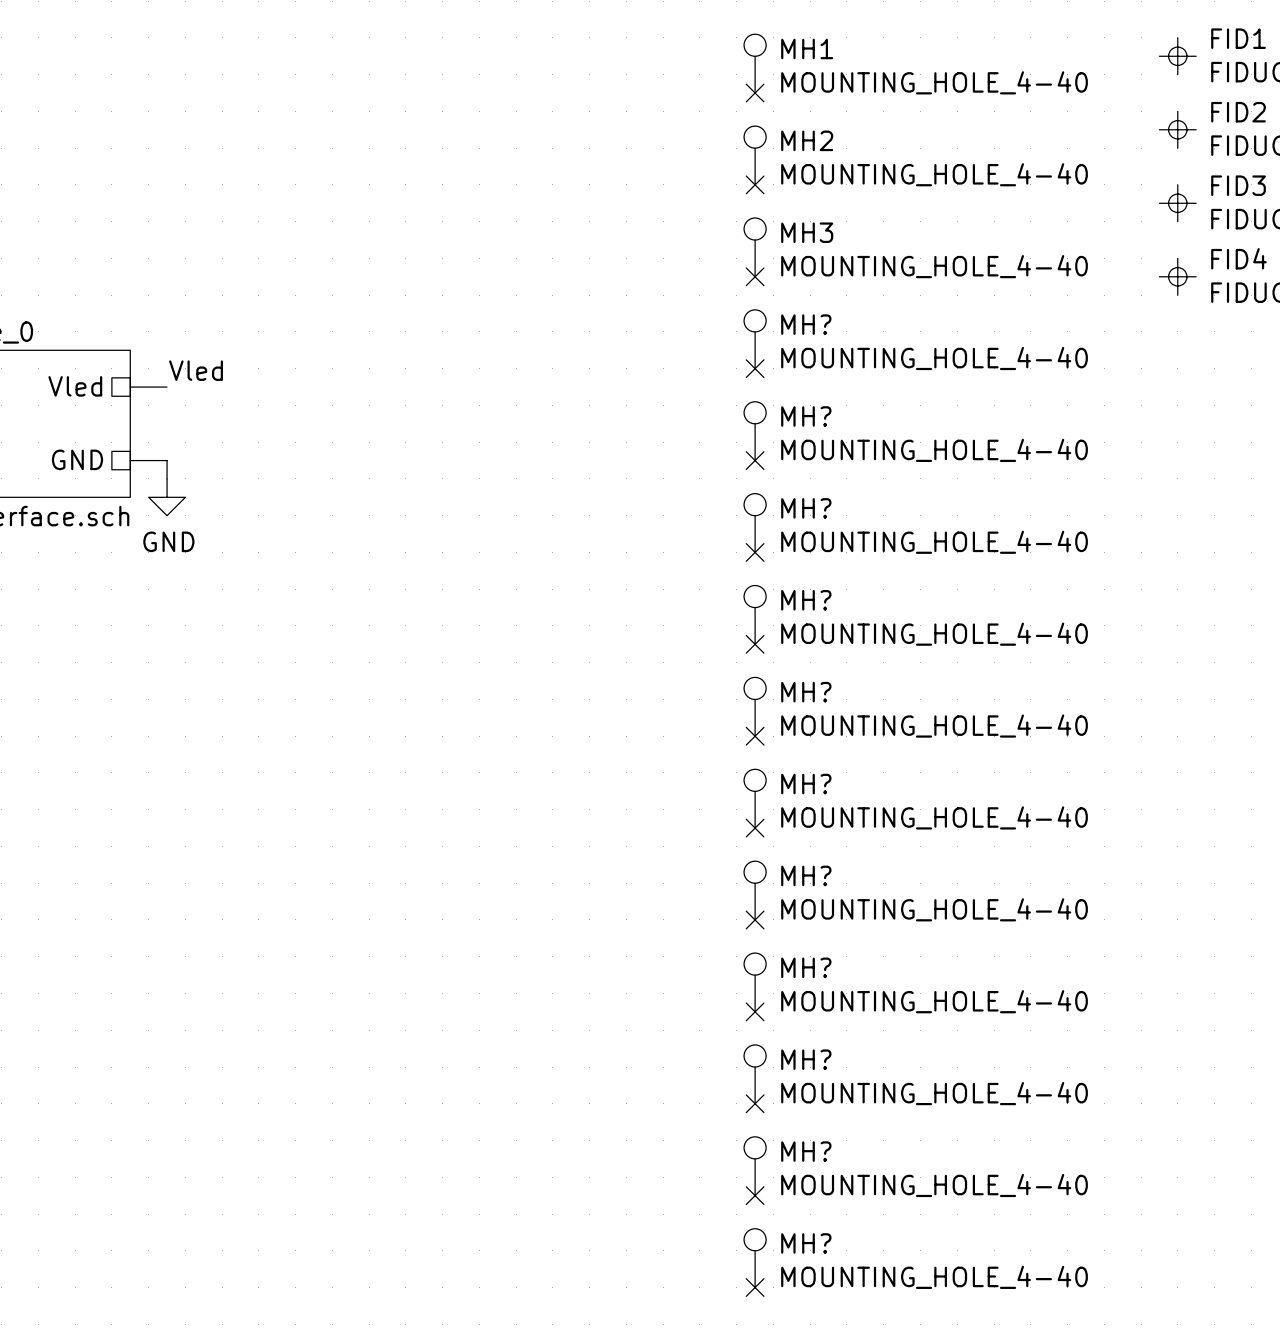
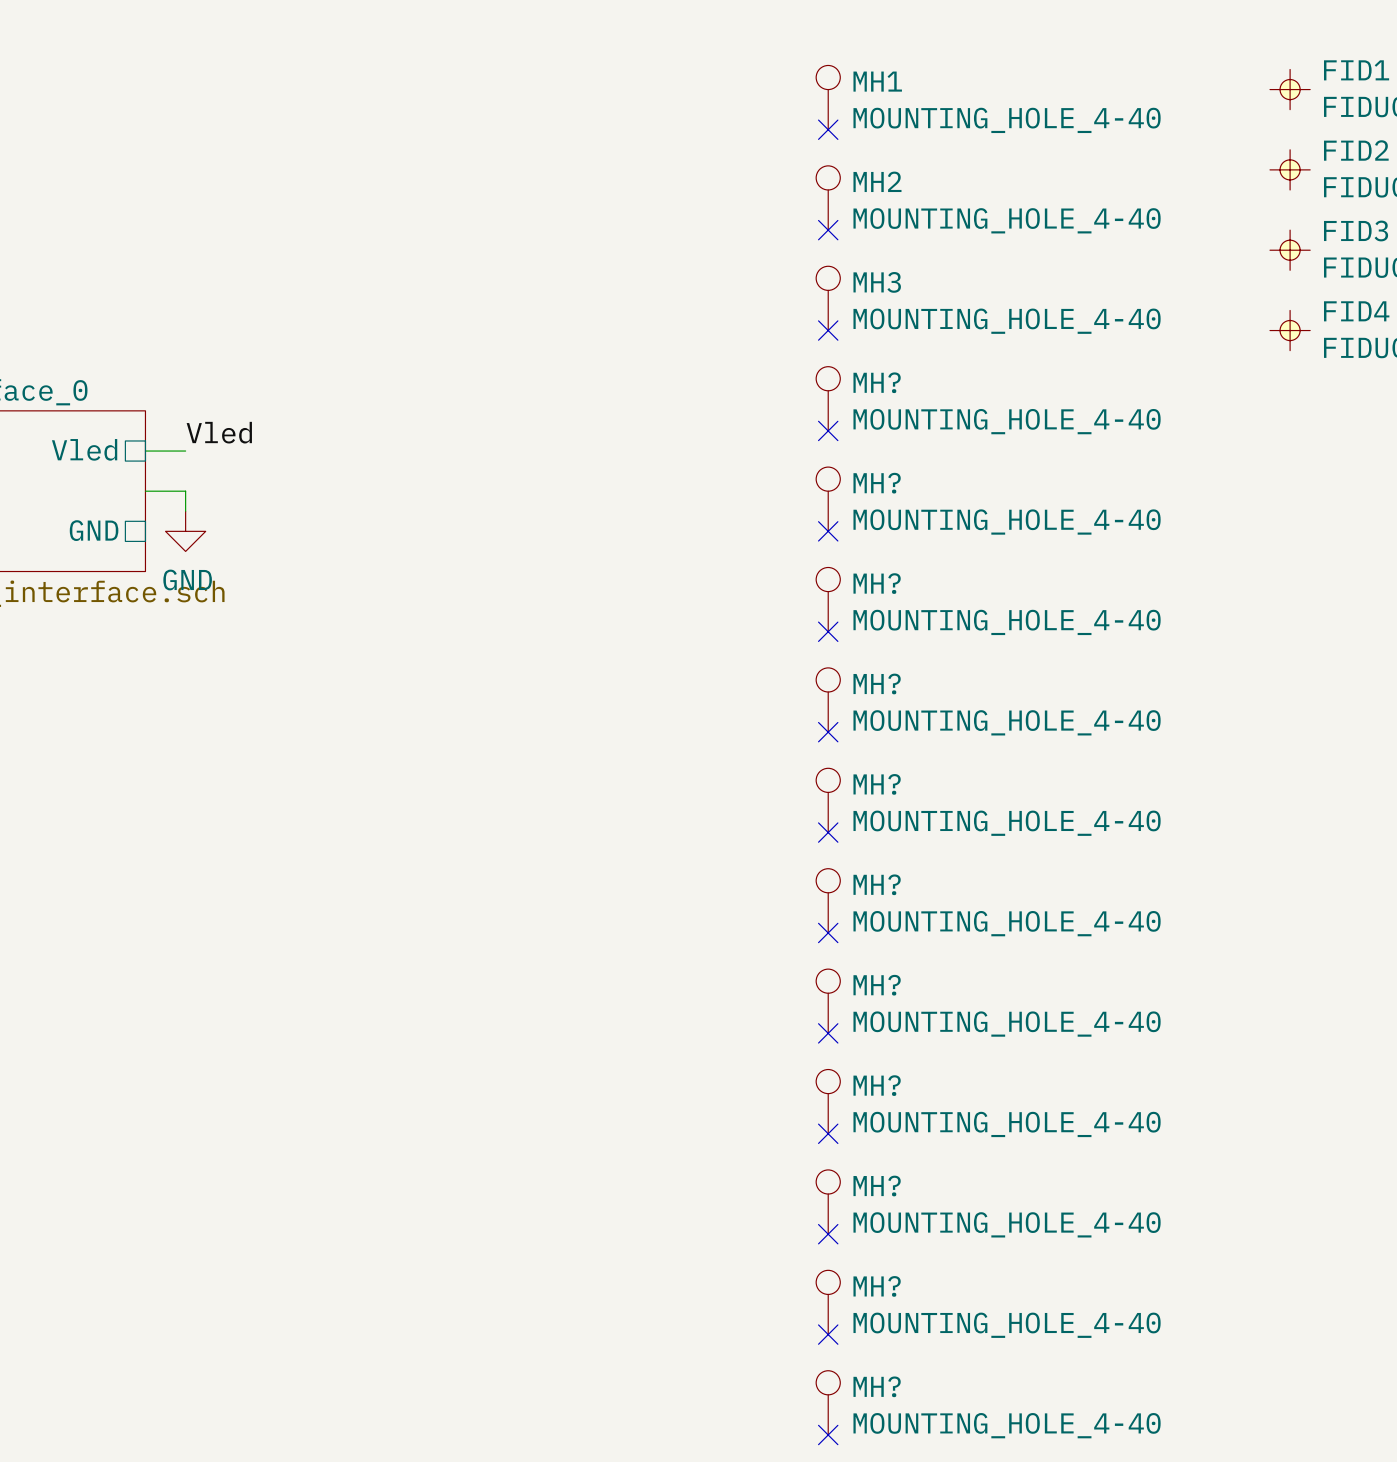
wire: (130, 460) (167, 460) (167, 478) -> (145, 491) (185, 491) (185, 511)
power symbol position: GND (167, 497) -> GND (185, 531)

